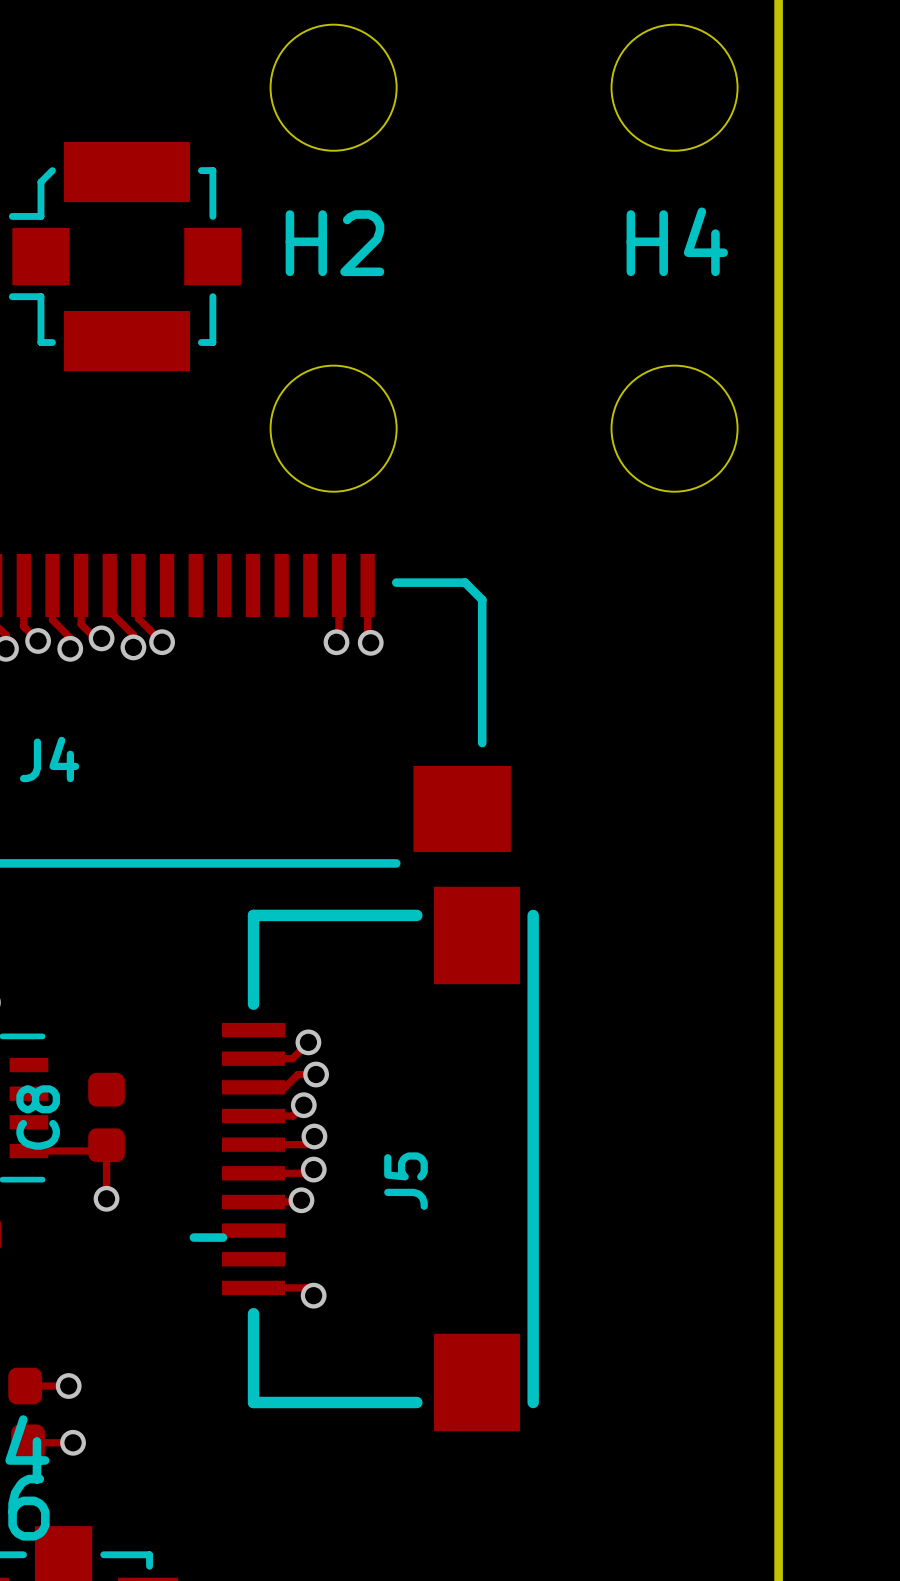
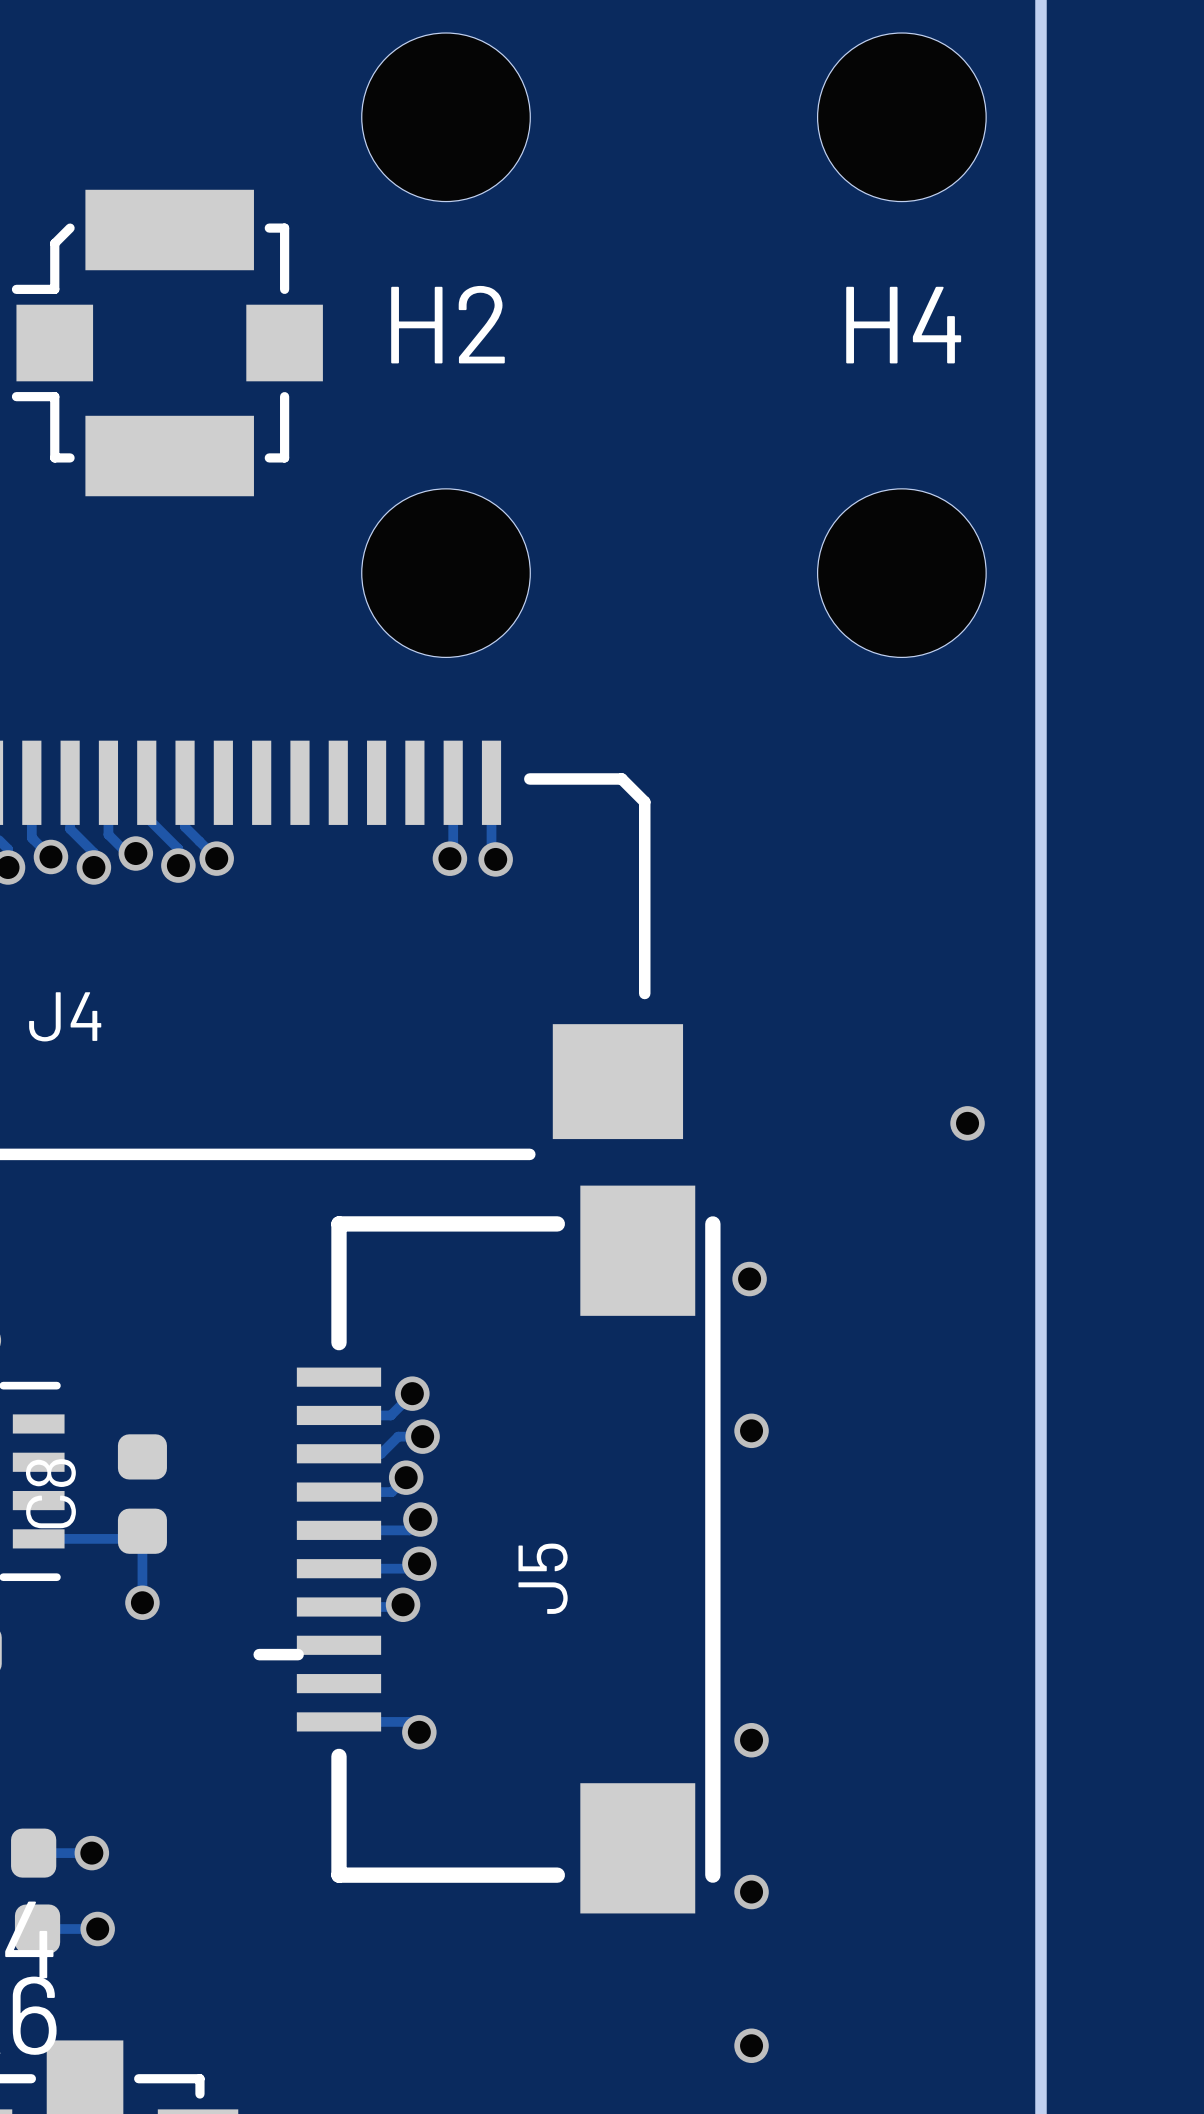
via: none -> (967, 1123)
via: none -> (749, 1279)
via: none -> (751, 1430)
via: none -> (751, 1740)
via: none -> (751, 1892)
via: none -> (751, 2045)

